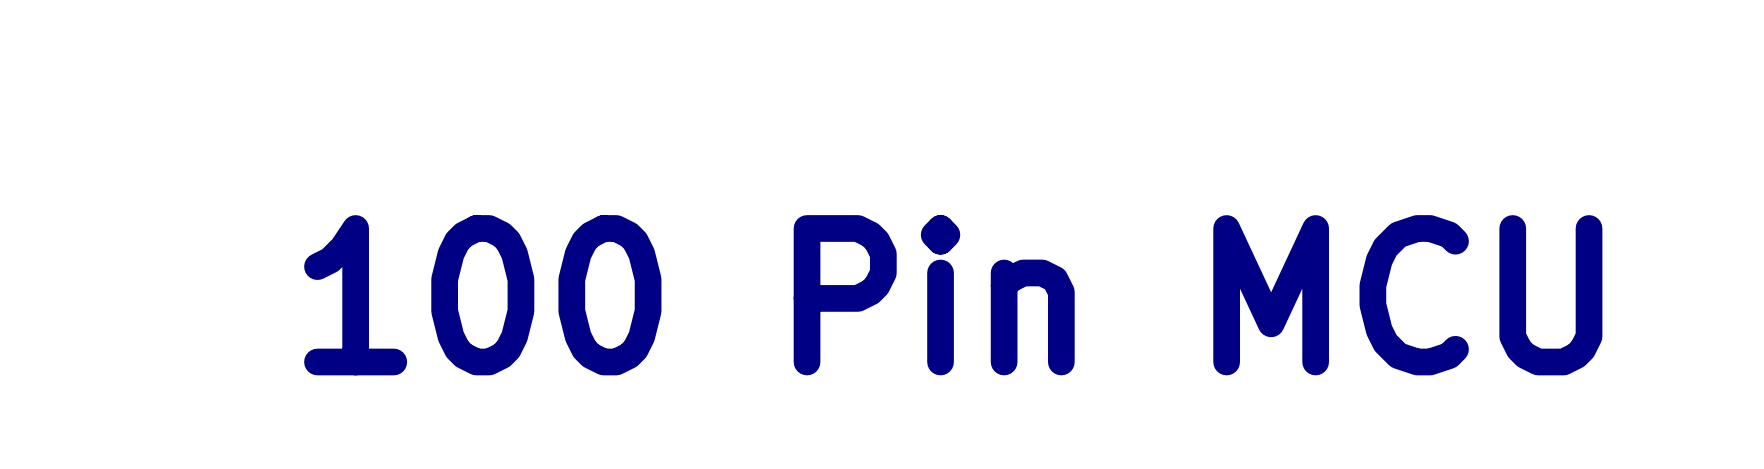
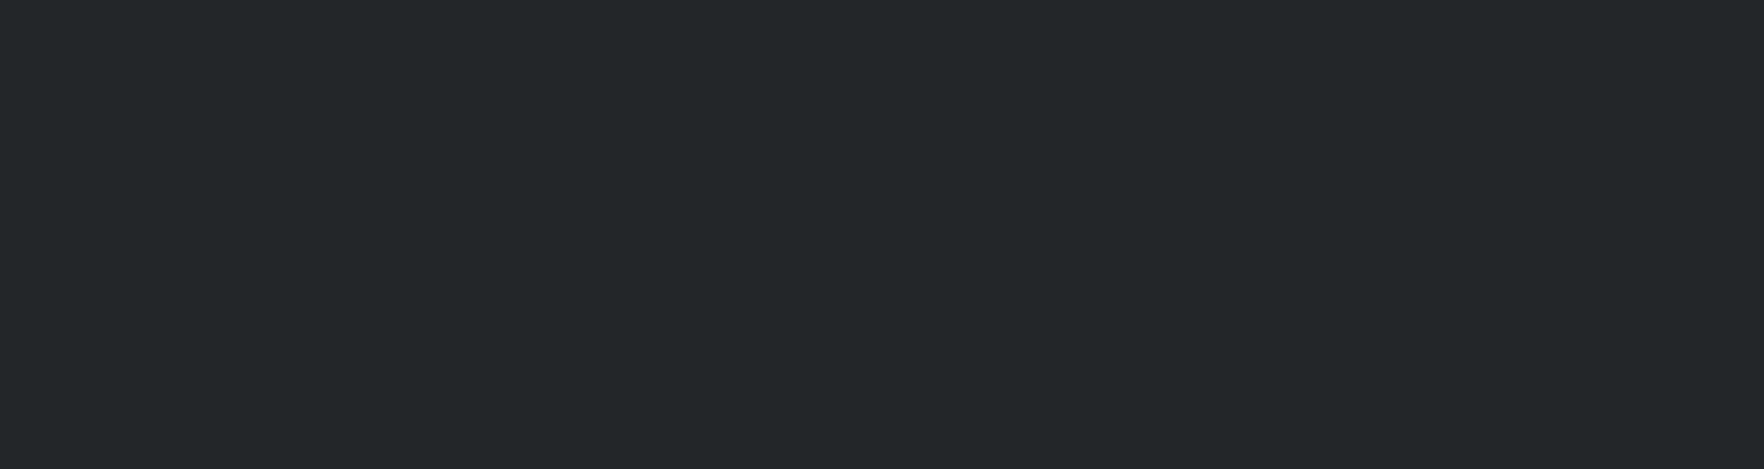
text: 100 Pin MCU (953, 295) -> none

